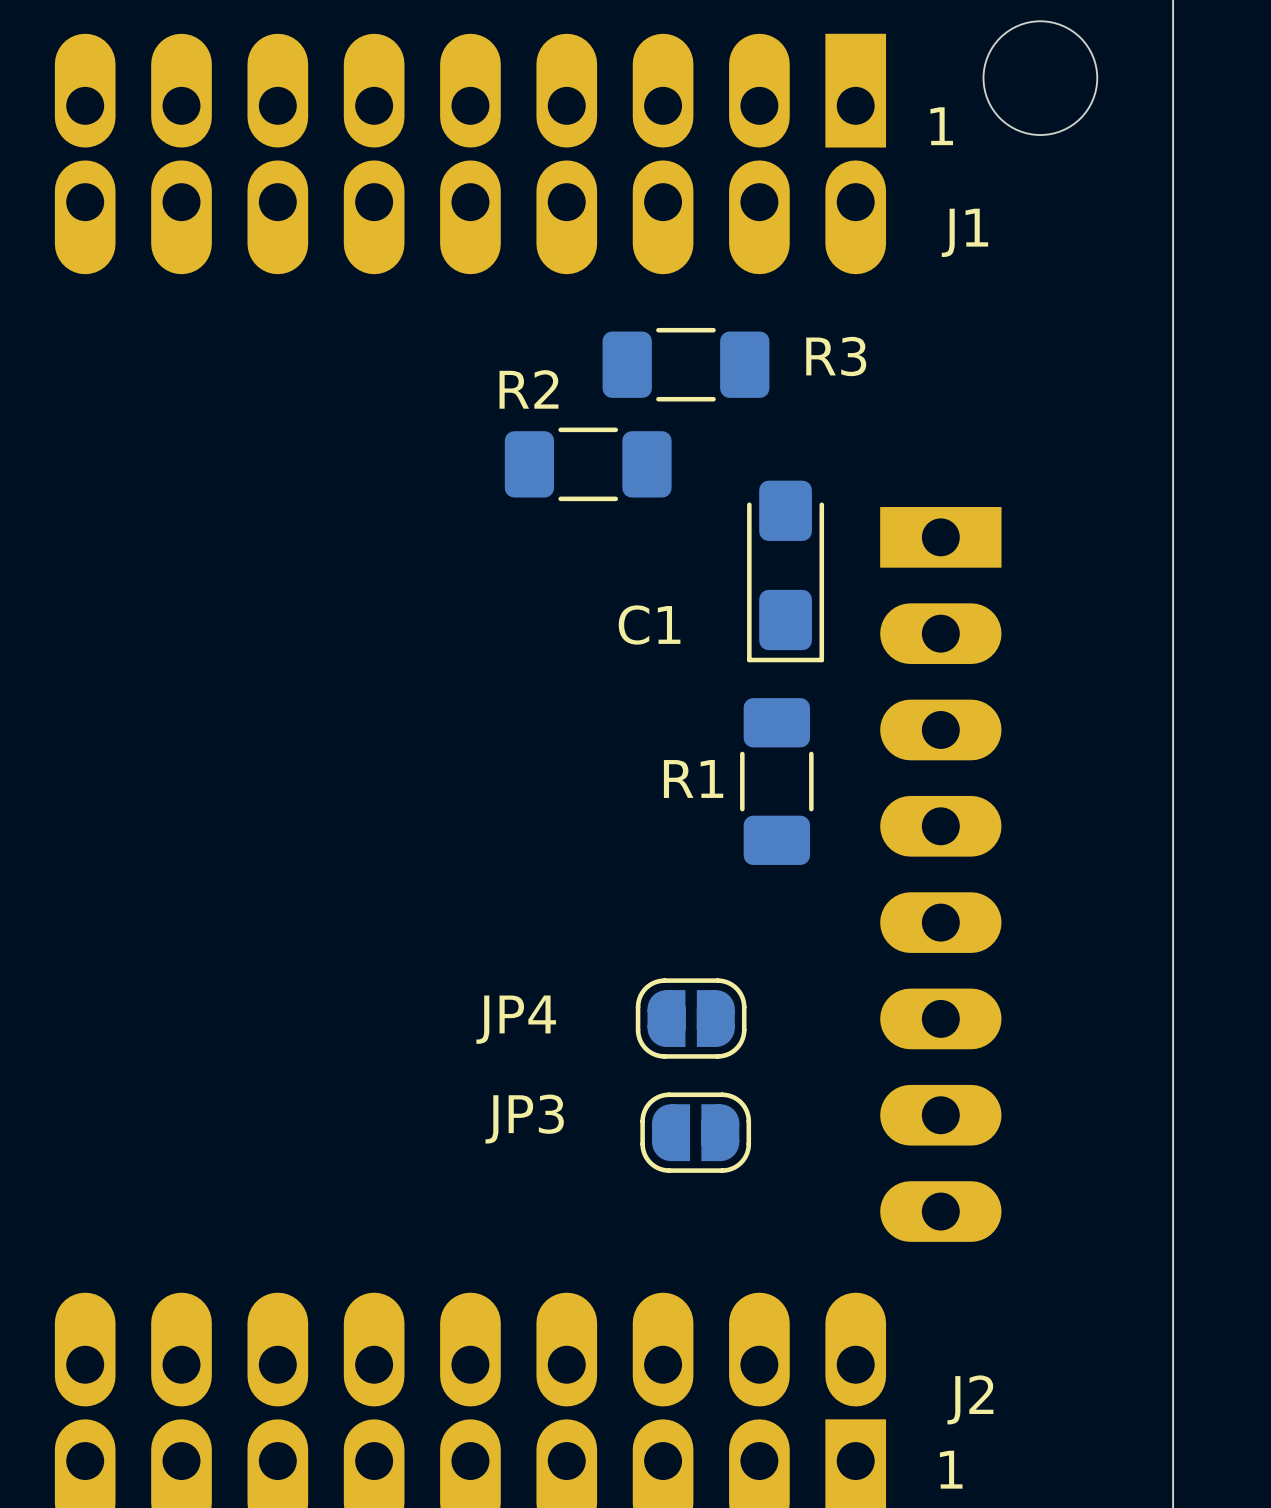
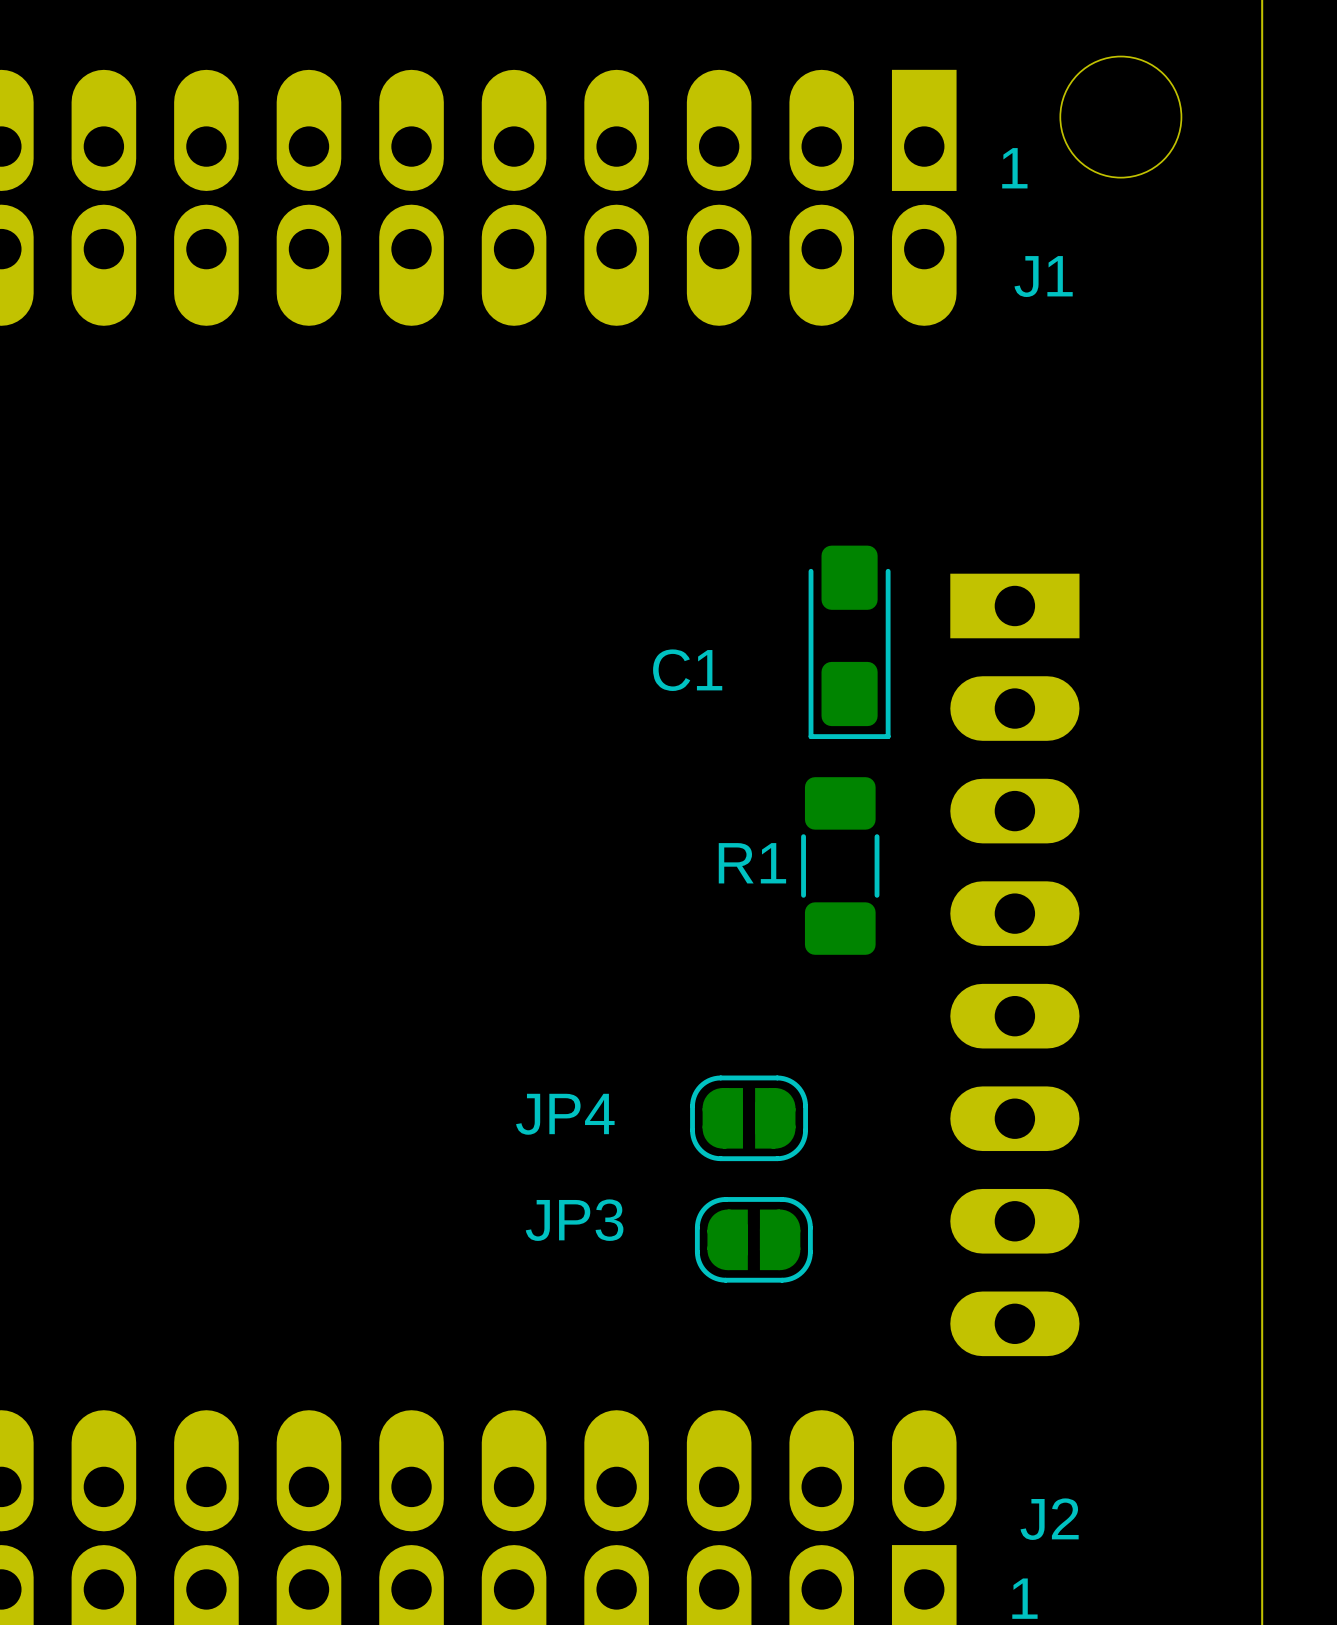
R3: (685, 364) -> none
R2: (588, 464) -> none
C1 name position: C1 (649, 625) -> C1 (687, 670)

